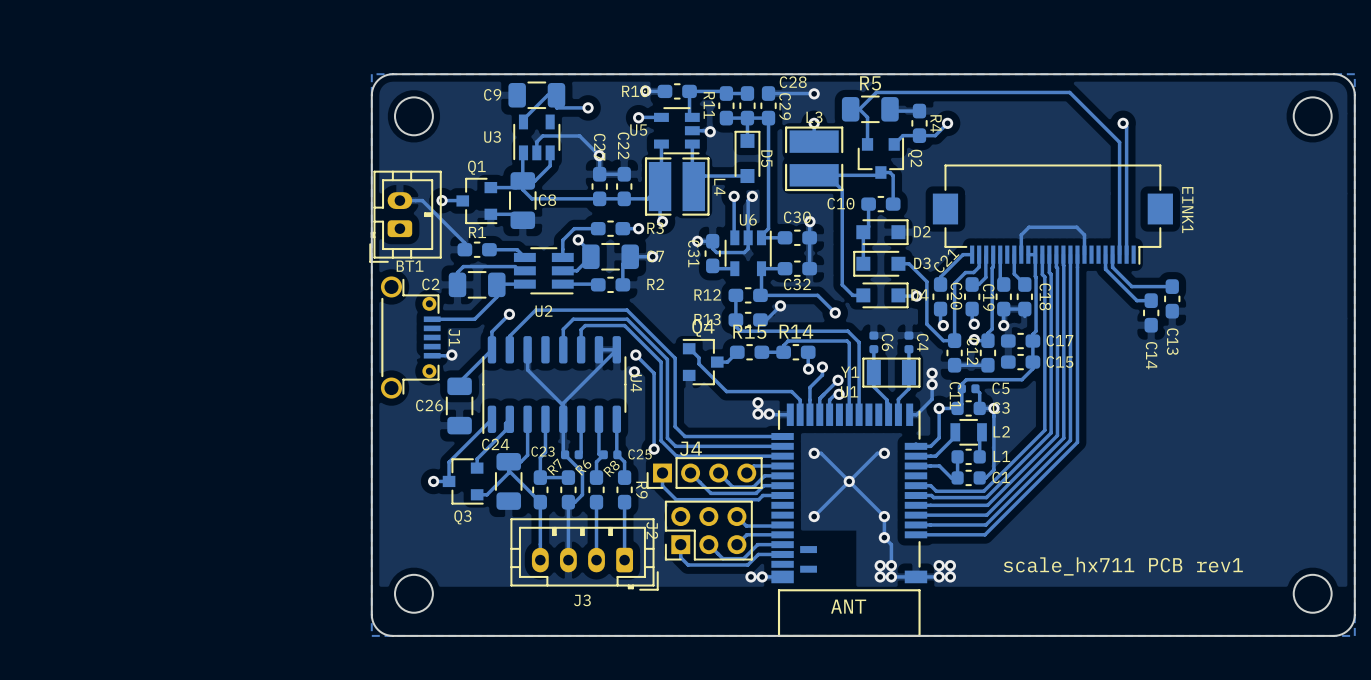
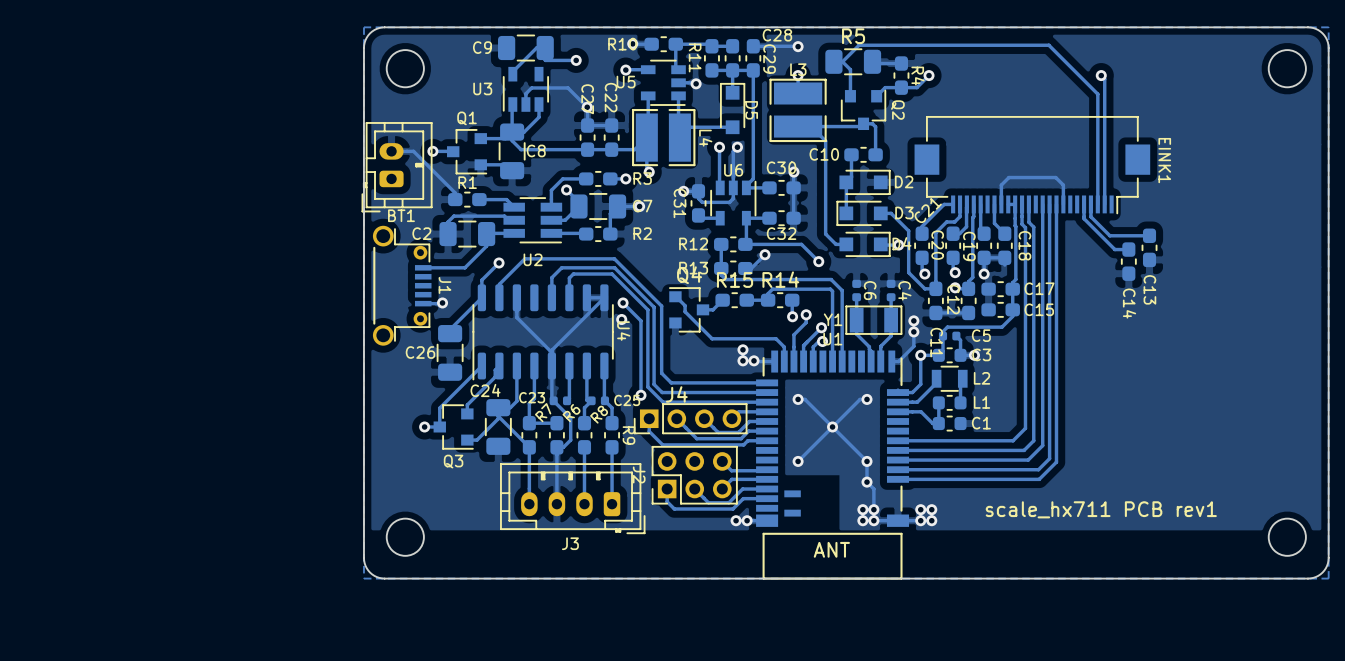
track: (1056, 254) (1057, 435) (987, 505) -> (1028, 222) (1033, 227) (1033, 440) (1024, 450) (968, 450)
track: (1063, 265) (1063, 438) (986, 515) -> (1042, 214) (1042, 445) (1028, 460) (967, 460)
track: (1049, 272) (1051, 274) (1051, 432) (986, 497) (933, 497) (931, 495) -> (1022, 224) (1025, 227) (1025, 428) (1013, 440) (913, 440)
track: (1042, 274) (1044, 277) (1044, 430) (983, 491) (936, 491) (930, 485) (915, 485) -> none
track: (993, 408) (993, 469) (985, 477) (979, 477) -> none
track: (1070, 440) (985, 524) -> (1049, 386) (1049, 458) (1038, 469) (966, 469)
track: (1077, 442) (984, 534) -> (1056, 388) (1056, 462) (1039, 479) (965, 479)

